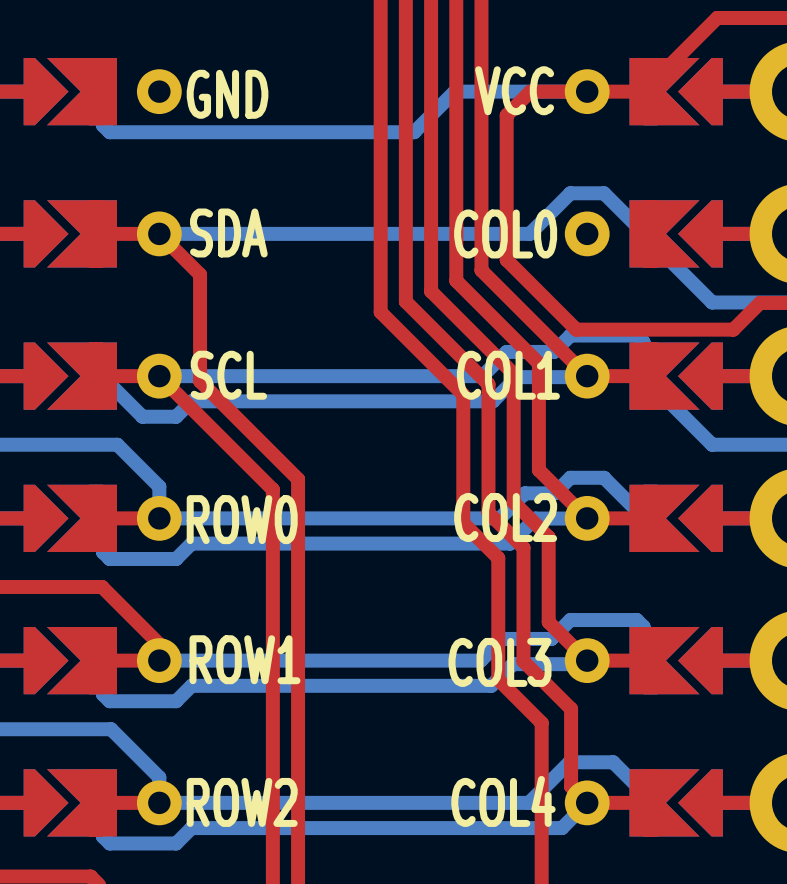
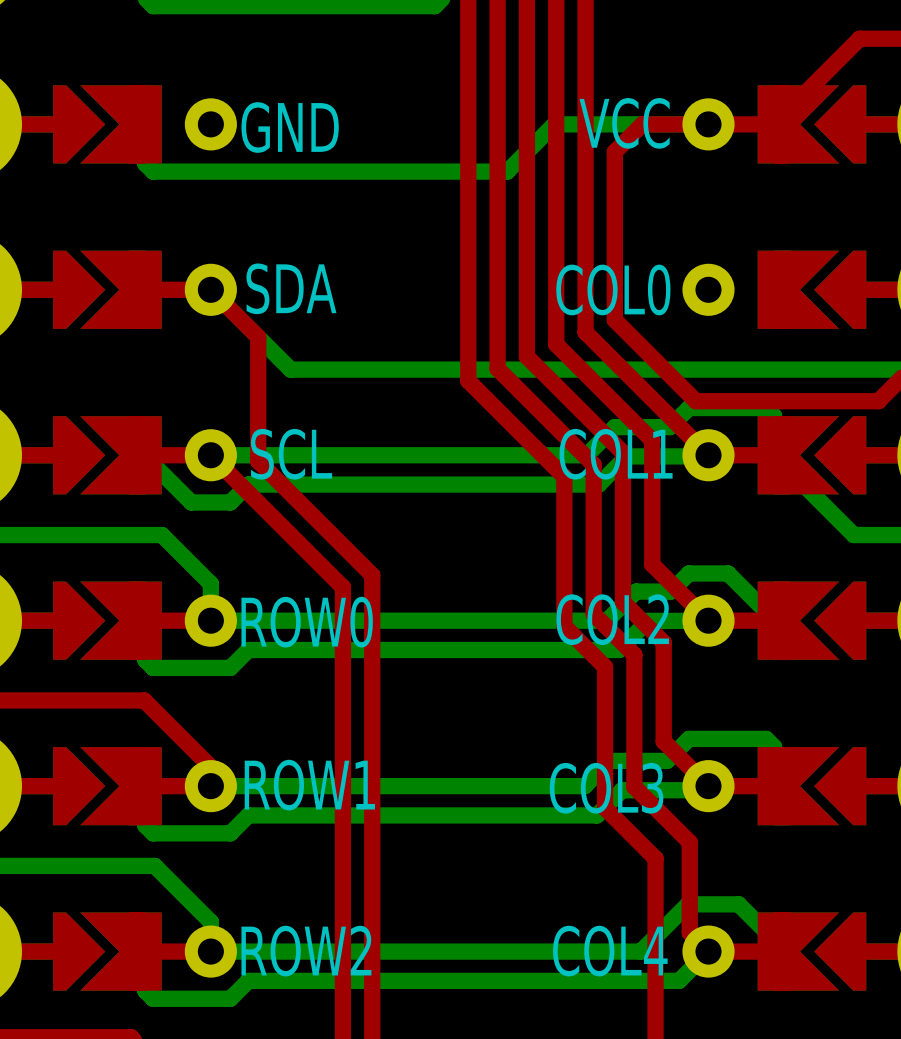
bottom track: (643, 232) (604, 193) (570, 193) (529, 233) (159, 233) -> (853, 369) (290, 369) (210, 289)
bottom track: (643, 233) (712, 302) -> none

